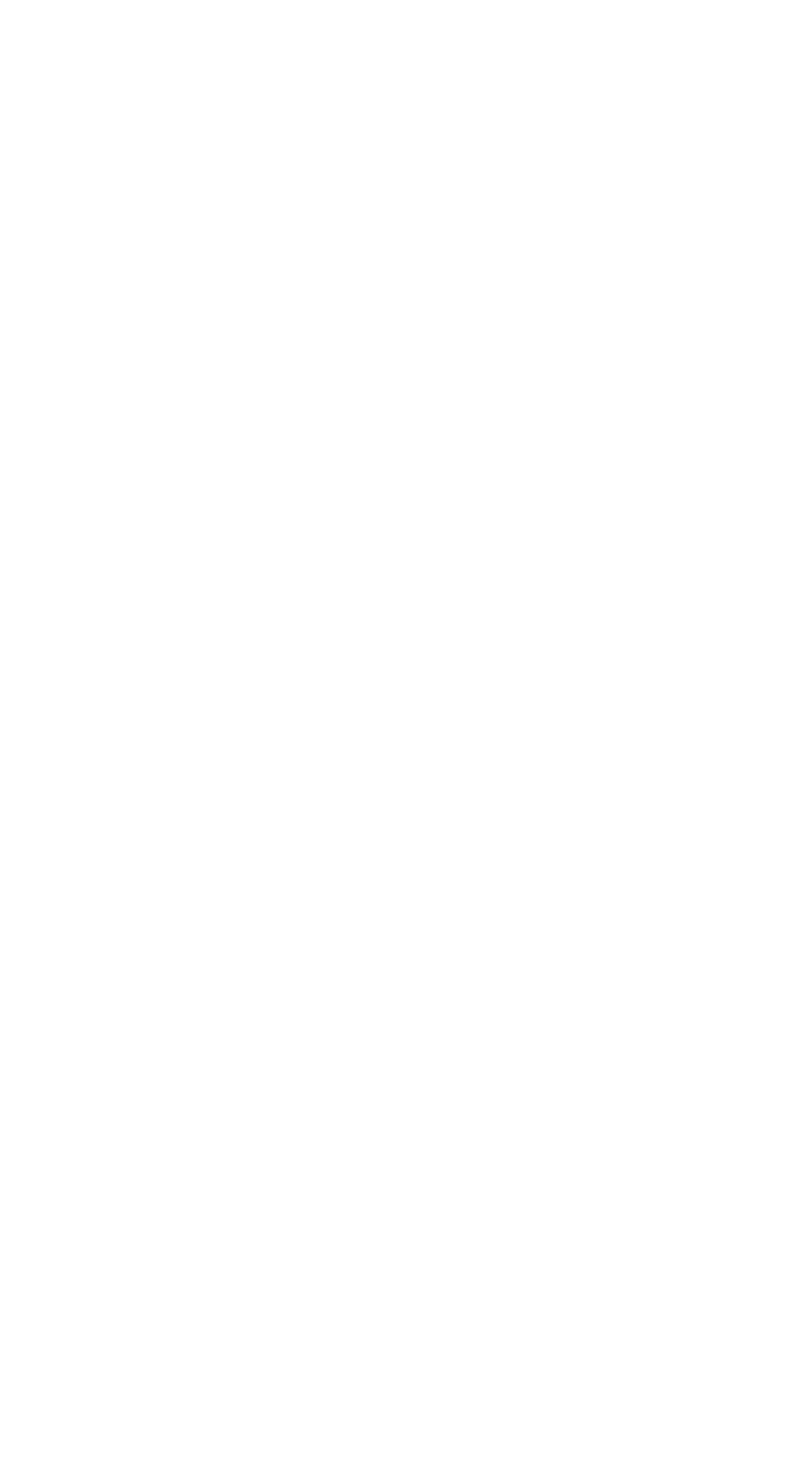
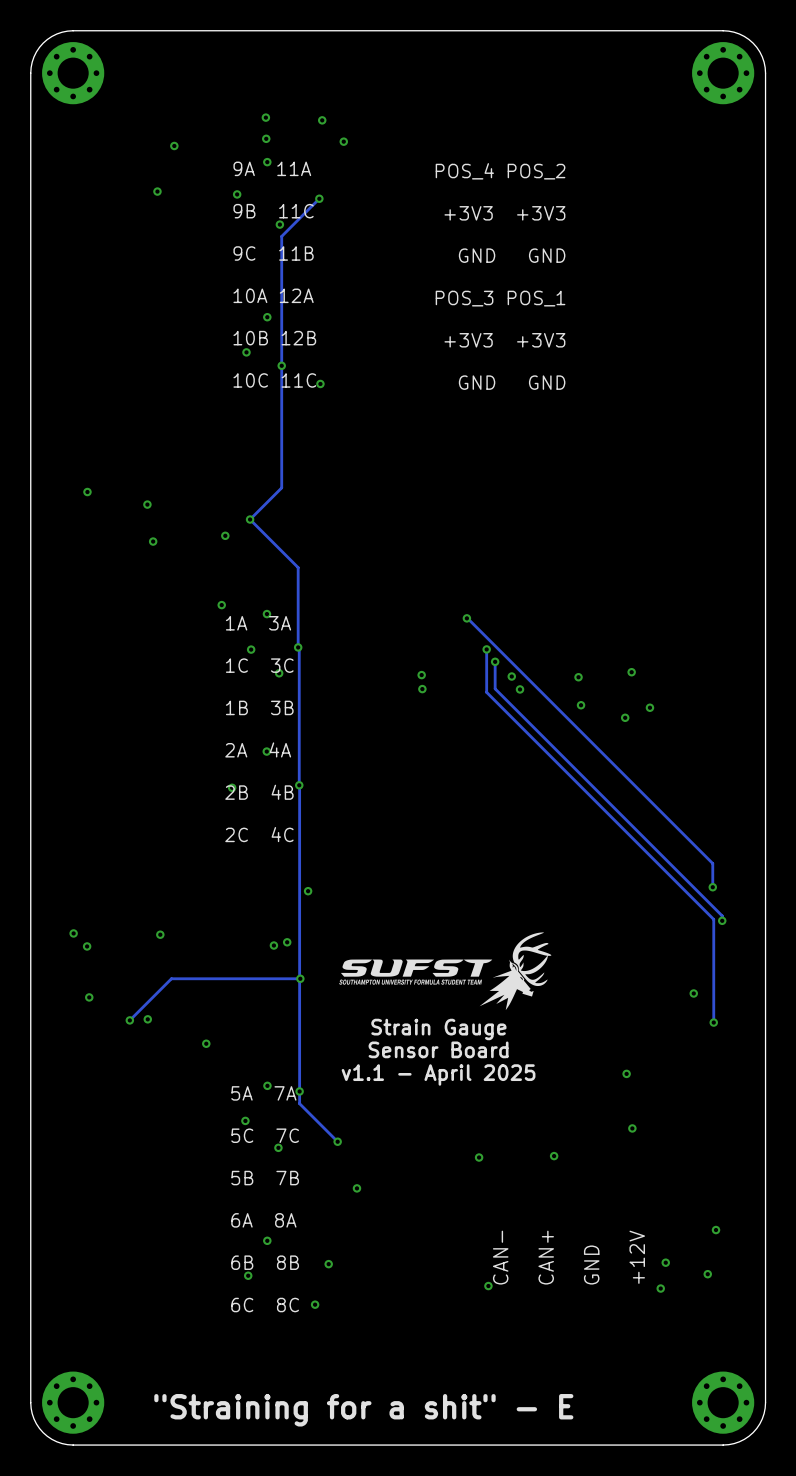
board edge: none -> (723, 30) (73, 30) (62, 32) (47, 39) (33, 56) (30, 73) (30, 1402) (36, 1423) (43, 1432) (56, 1441) (73, 1445) (723, 1445) (739, 1441) (748, 1436) (762, 1418) (765, 1402) (765, 73) (762, 56) (753, 43) (739, 33) (723, 30)
part: none -> (73, 73)
part: none -> (723, 73)
via: none -> (265, 117)
via: none -> (322, 120)
via: none -> (266, 138)
via: none -> (343, 141)
via: none -> (174, 145)
via: none -> (267, 162)
text: none -> 9A 11A (272, 168)
text: none -> POS_4 POS_2 (500, 171)
via: none -> (157, 191)
via: none -> (237, 194)
track: none -> (319, 198) (281, 236) (281, 487) (250, 519) (298, 567) (300, 978)
via: none -> (319, 198)
text: none -> 9B 11C (273, 211)
text: none -> +3V3 +3V3 (504, 213)
via: none -> (279, 224)
text: none -> 9C 11B (273, 253)
text: none -> GND GND (512, 255)
text: none -> 10A 12A (273, 295)
text: none -> POS_3 POS_1 (500, 298)
via: none -> (267, 317)
text: none -> 10B 12B (274, 338)
text: none -> +3V3 +3V3 (504, 340)
via: none -> (246, 352)
via: none -> (281, 365)
text: none -> 10C 11C (274, 380)
text: none -> GND GND (512, 382)
via: none -> (320, 383)
via: none -> (87, 492)
via: none -> (147, 504)
via: none -> (250, 519)
via: none -> (225, 535)
via: none -> (153, 541)
via: none -> (221, 605)
via: none -> (266, 614)
track: none -> (466, 618) (712, 863) (712, 887)
via: none -> (466, 618)
text: none -> 1A 3A (258, 623)
via: none -> (298, 647)
via: none -> (251, 649)
track: none -> (486, 649) (486, 692) (713, 919) (713, 1022)
via: none -> (486, 649)
track: none -> (495, 661) (495, 688) (722, 915) (722, 920)
via: none -> (495, 661)
text: none -> 1C 3C (259, 665)
via: none -> (631, 672)
via: none -> (279, 673)
via: none -> (421, 675)
via: none -> (511, 676)
via: none -> (578, 677)
via: none -> (422, 689)
via: none -> (520, 689)
via: none -> (581, 705)
text: none -> 1B 3B (259, 707)
via: none -> (649, 707)
via: none -> (625, 717)
text: none -> 2A 4A (258, 749)
via: none -> (266, 751)
via: none -> (299, 785)
via: none -> (232, 787)
text: none -> 2B 4B (259, 792)
text: none -> 2C 4C (259, 834)
via: none -> (712, 887)
via: none -> (308, 891)
via: none -> (722, 920)
drawing: none -> [339, 932, 552, 1011]
via: none -> (73, 933)
via: none -> (160, 934)
via: none -> (287, 942)
via: none -> (273, 945)
via: none -> (87, 946)
track: none -> (300, 978) (299, 1103) (337, 1141)
track: none -> (300, 978) (171, 978) (129, 1020)
via: none -> (300, 978)
via: none -> (693, 993)
via: none -> (89, 997)
via: none -> (147, 1019)
via: none -> (129, 1020)
via: none -> (713, 1022)
text: none -> Strain Gauge (438, 1029)
via: none -> (206, 1043)
text: none -> Sensor Board (438, 1049)
via: none -> (626, 1073)
text: none -> v1.1 - April 2025 (438, 1074)
via: none -> (267, 1085)
via: none -> (299, 1091)
text: none -> 5A 7A (263, 1093)
via: none -> (245, 1120)
via: none -> (632, 1128)
text: none -> 5C 7C (265, 1135)
via: none -> (337, 1141)
via: none -> (278, 1147)
via: none -> (554, 1156)
via: none -> (479, 1157)
text: none -> 5B 7B (265, 1178)
via: none -> (356, 1188)
text: none -> 6A 8A (263, 1220)
via: none -> (716, 1230)
via: none -> (267, 1240)
text: none -> CAN- (500, 1257)
text: none -> CAN+ (546, 1257)
text: none -> +12V (637, 1257)
text: none -> 6B 8B (265, 1262)
via: none -> (665, 1262)
via: none -> (328, 1264)
text: none -> GND (591, 1265)
via: none -> (707, 1274)
via: none -> (248, 1275)
via: none -> (488, 1286)
via: none -> (660, 1288)
via: none -> (315, 1304)
text: none -> 6C 8C (265, 1305)
part: none -> (73, 1402)
part: none -> (723, 1402)
text: none -> "Straining for a shit" - E (363, 1410)

